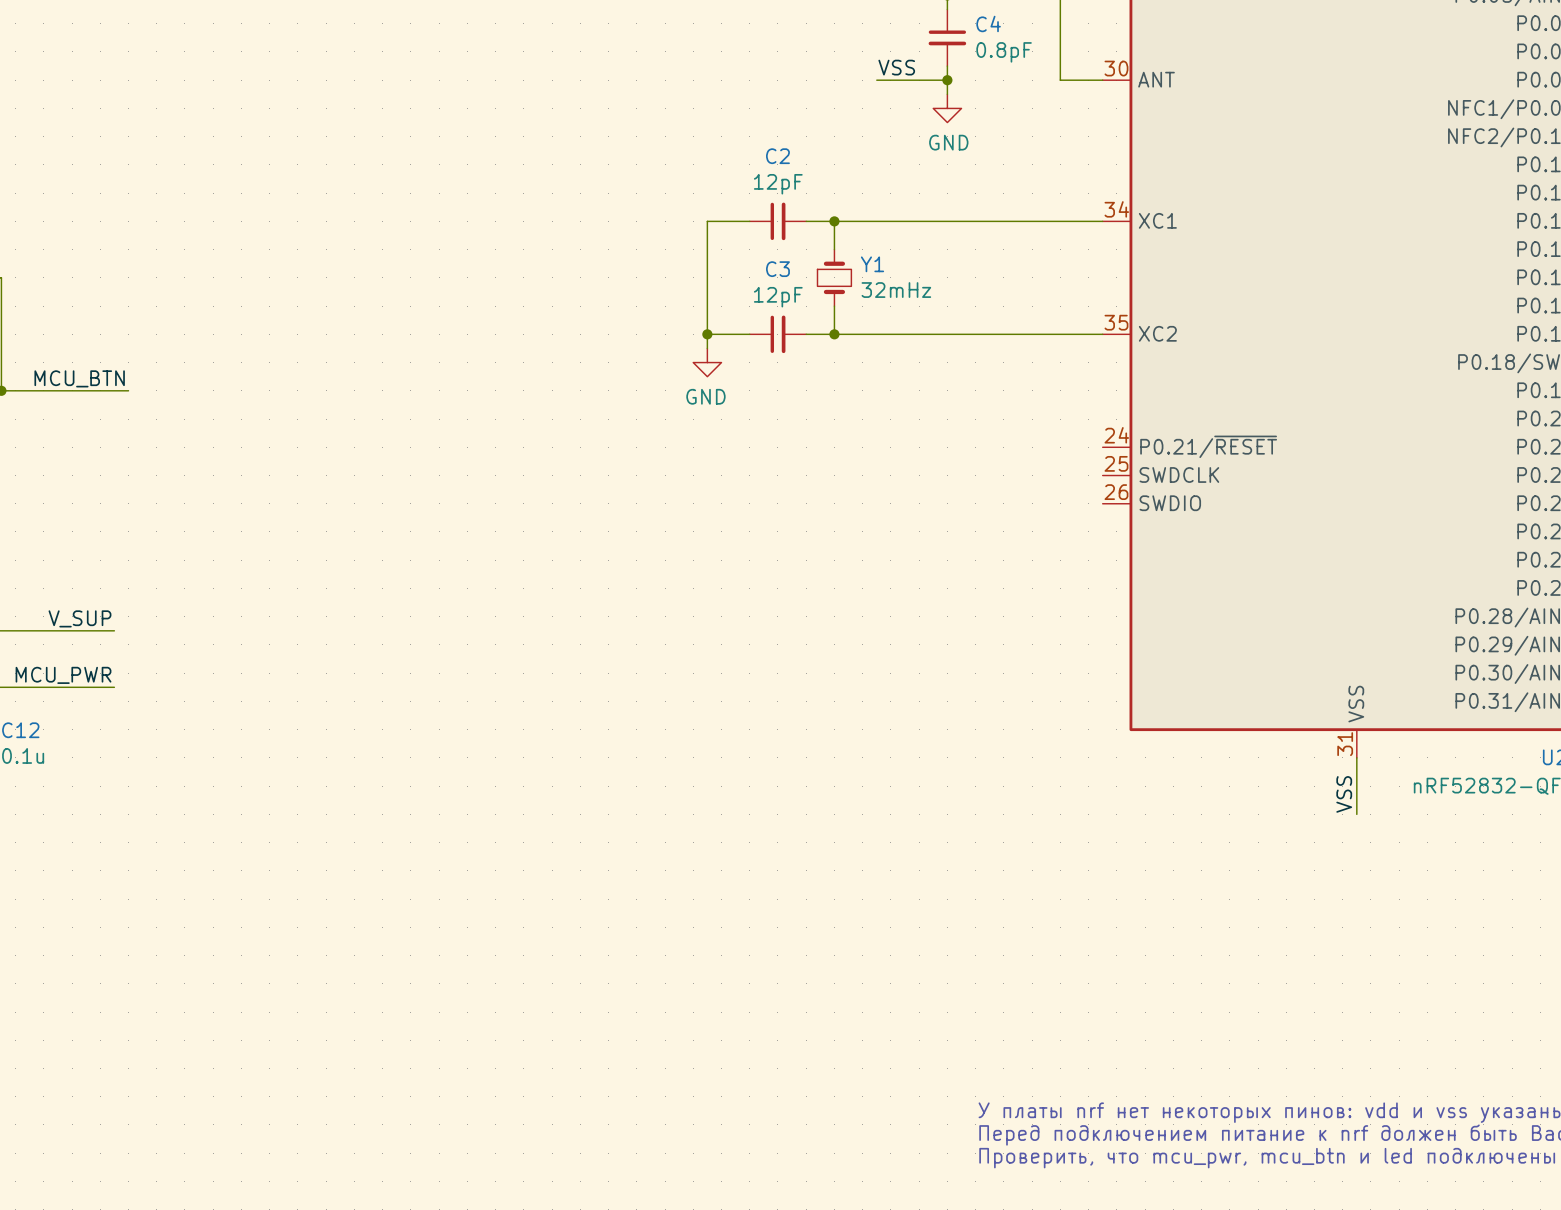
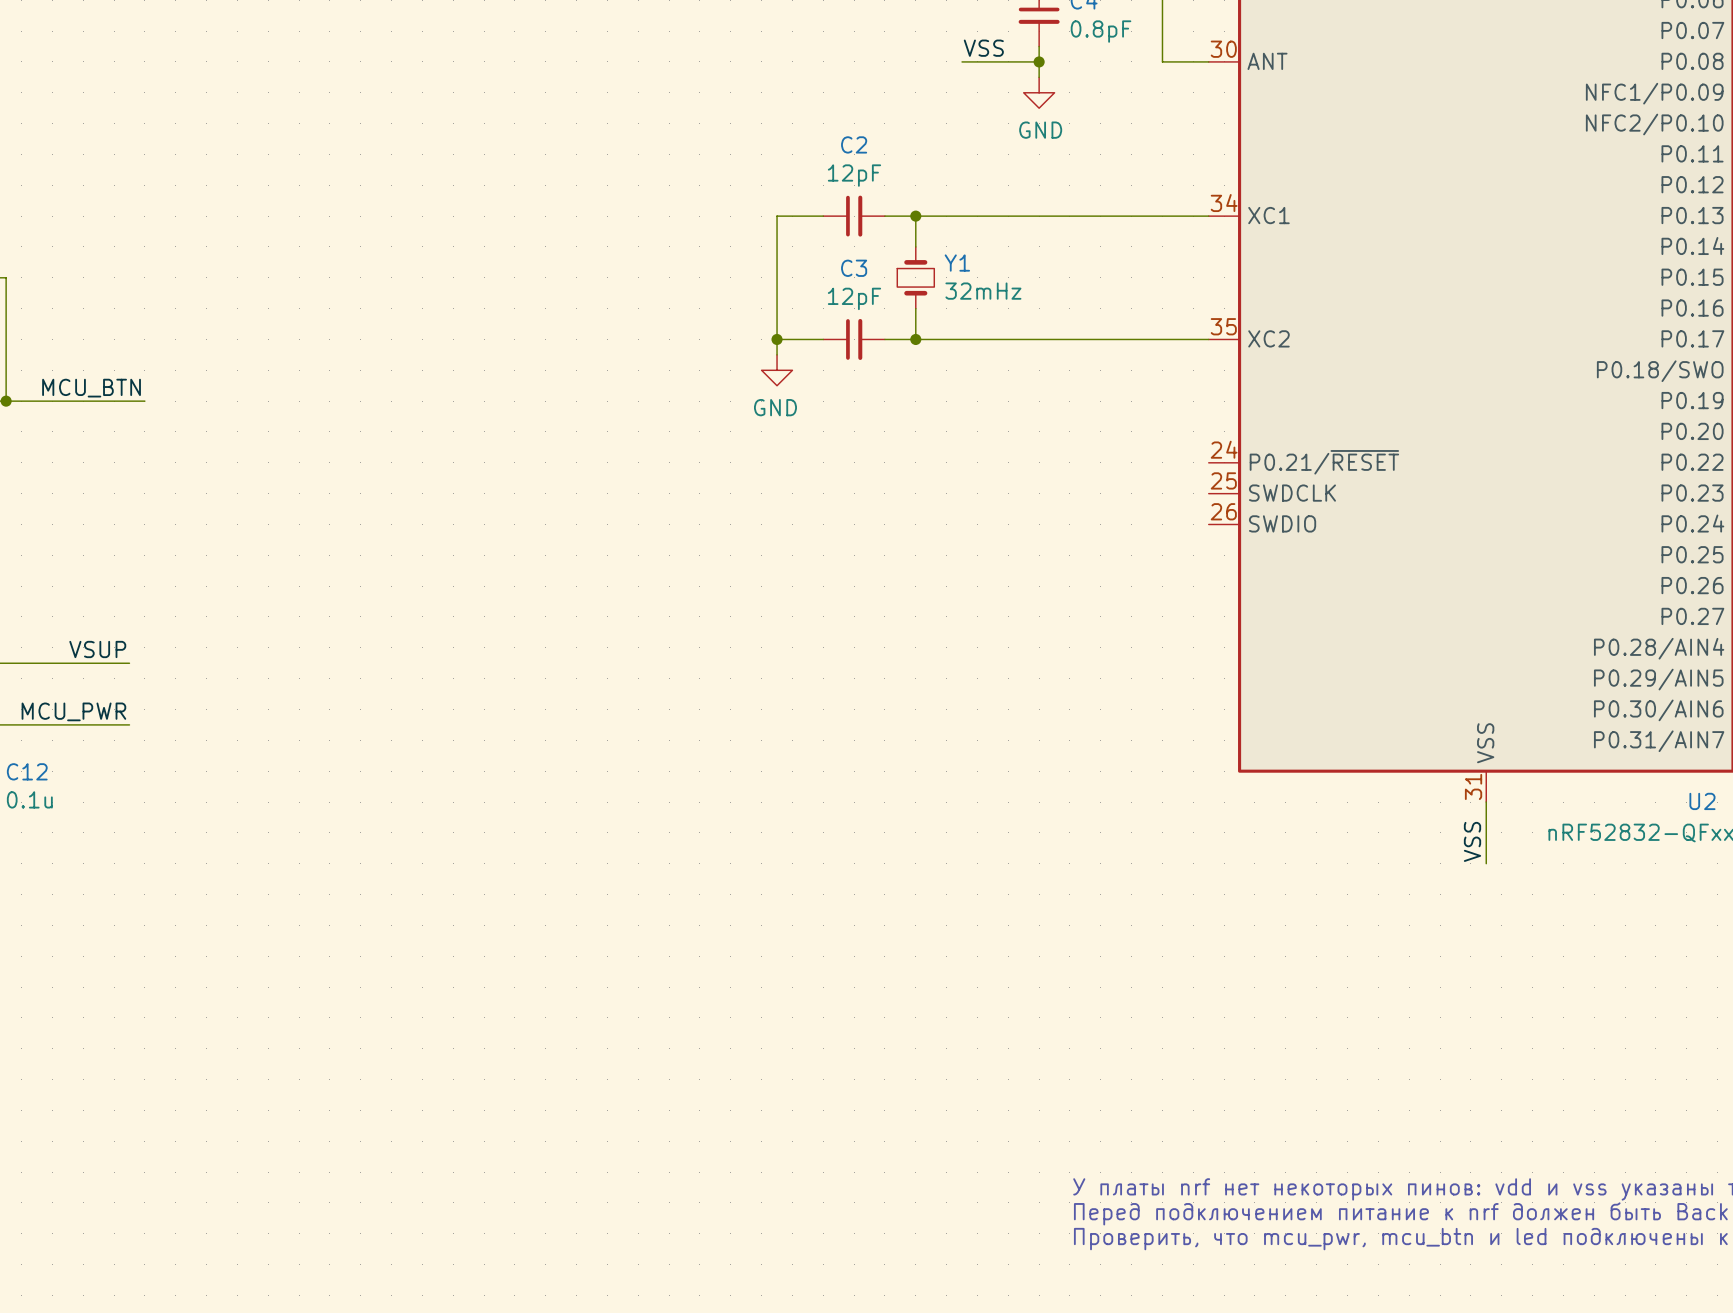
label: V_SUP (79, 618) -> VSUP (97, 649)

